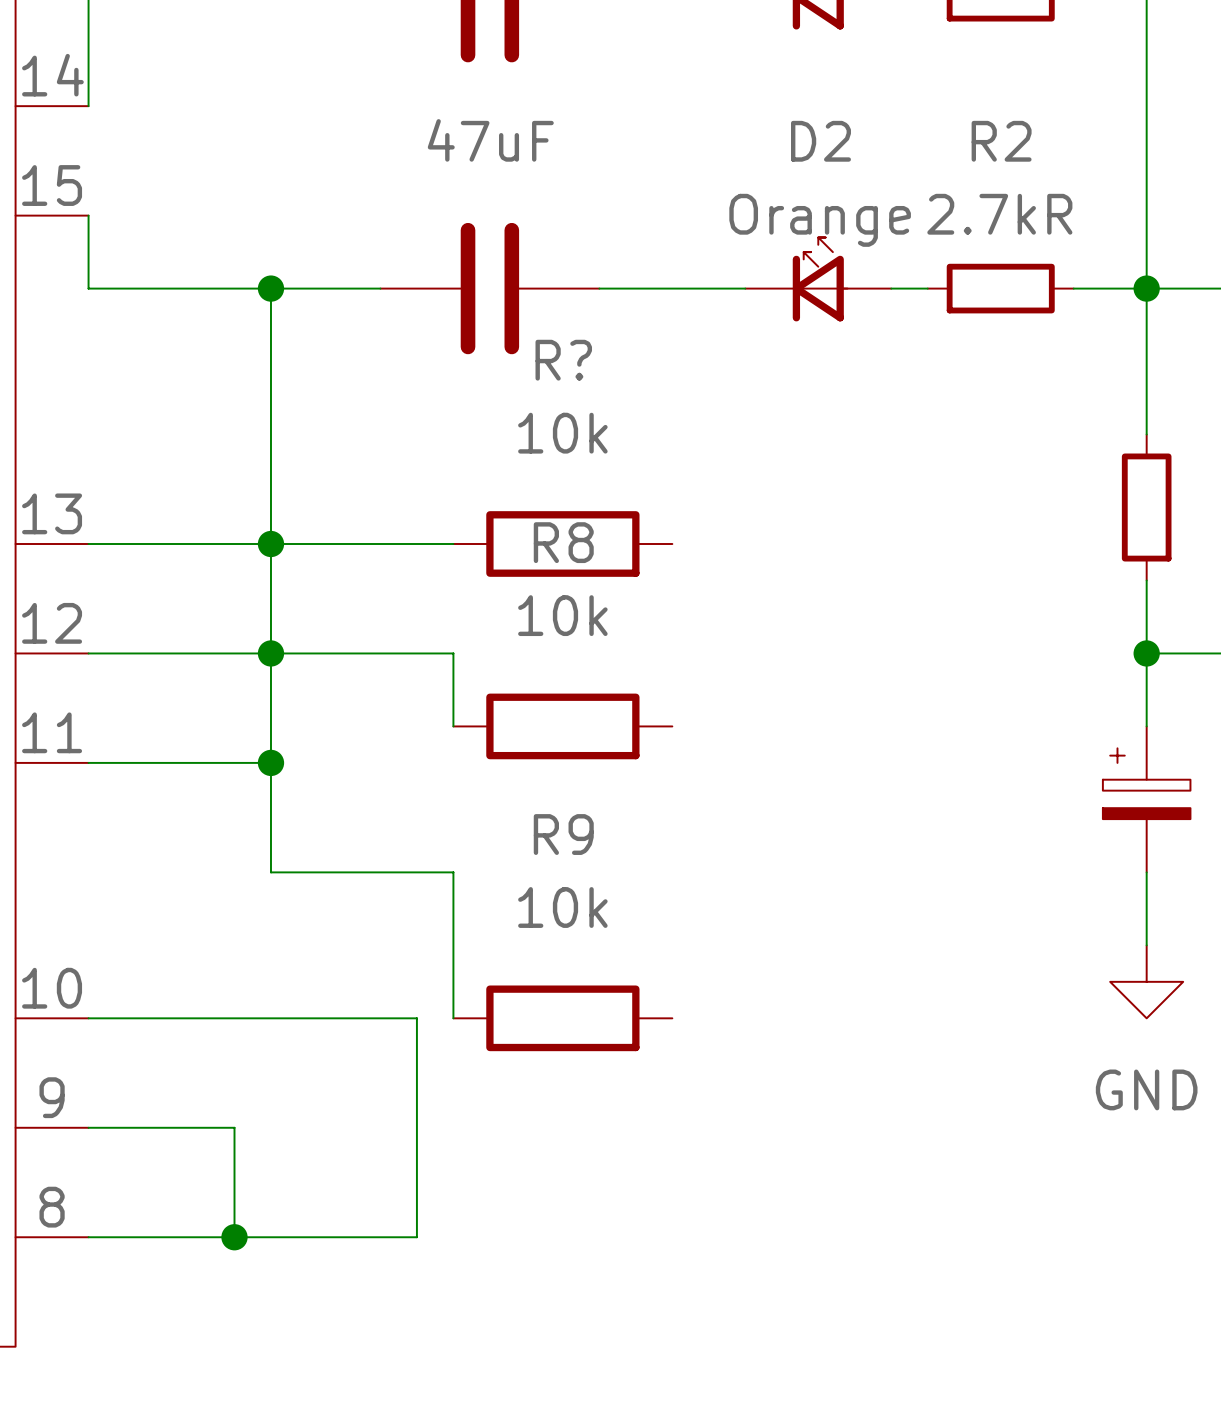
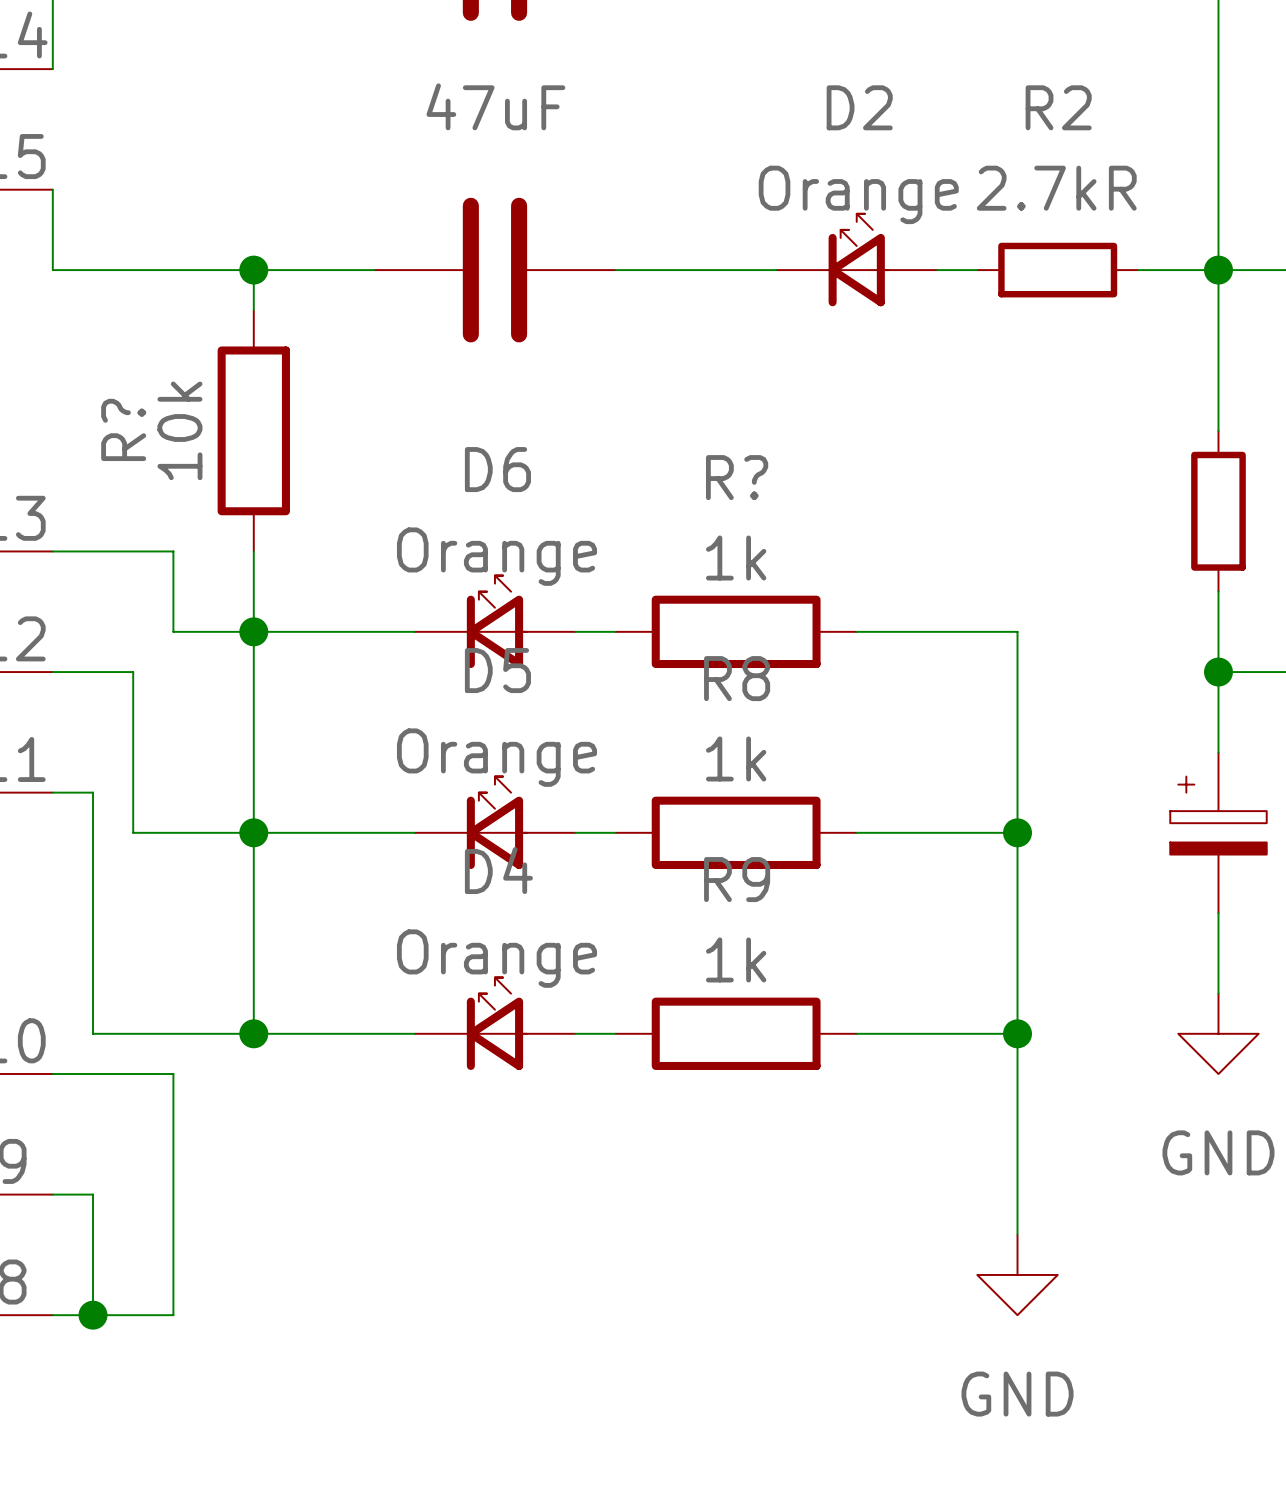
wire: (270, 325) (270, 543) -> none
R? name position: R? (563, 360) -> R? (123, 429)
R? value position: 10k (562, 433) -> 10k (179, 430)
R8 name position: R8 (563, 542) -> R8 (737, 678)
wire: (198, 543) (453, 543) -> (173, 551) (173, 631) (414, 631)
junction: (270, 543) -> none
R? rotation: 0° (562, 543) -> 90° clockwise (253, 430)
R? position: (562, 543) -> (253, 430)
D6: none -> Orange (494, 621)
R8 value: 10k (562, 615) -> 1k (736, 758)
junction: none -> (253, 631)
wire: none -> (575, 631) (615, 631)
R?: none -> 1k (736, 631)
wire: none -> (856, 631) (1017, 631) (1017, 1234)
wire: (161, 653) (453, 653) (453, 726) -> (133, 672) (133, 832) (414, 832)
junction: (270, 653) -> none
R8 position: (562, 726) -> (736, 832)
wire: (125, 762) (270, 762) -> (93, 792) (93, 1033) (414, 1033)
junction position: (270, 762) -> (253, 832)
D5: none -> Orange (494, 822)
wire: none -> (575, 832) (615, 832)
wire: none -> (856, 832) (1017, 832)
junction: none -> (1017, 832)
R9 name position: R9 (563, 834) -> R9 (737, 879)
wire: (270, 872) (453, 872) (453, 1018) -> (253, 913) (253, 1033)
R9 value: 10k (562, 907) -> 1k (736, 959)
D4: none -> Orange (494, 1023)
junction: none -> (253, 1033)
wire: none -> (575, 1033) (615, 1033)
wire: none -> (856, 1033) (1017, 1033)
junction: none -> (1017, 1033)
wire: (198, 1018) (416, 1018) (416, 1237) (198, 1237) -> (173, 1074) (173, 1315)
R9 position: (562, 1018) -> (736, 1033)
wire: (125, 1127) (234, 1127) (234, 1237) -> (93, 1194) (93, 1315)
power symbol: none -> GND (1017, 1274)
junction position: (234, 1237) -> (93, 1315)

